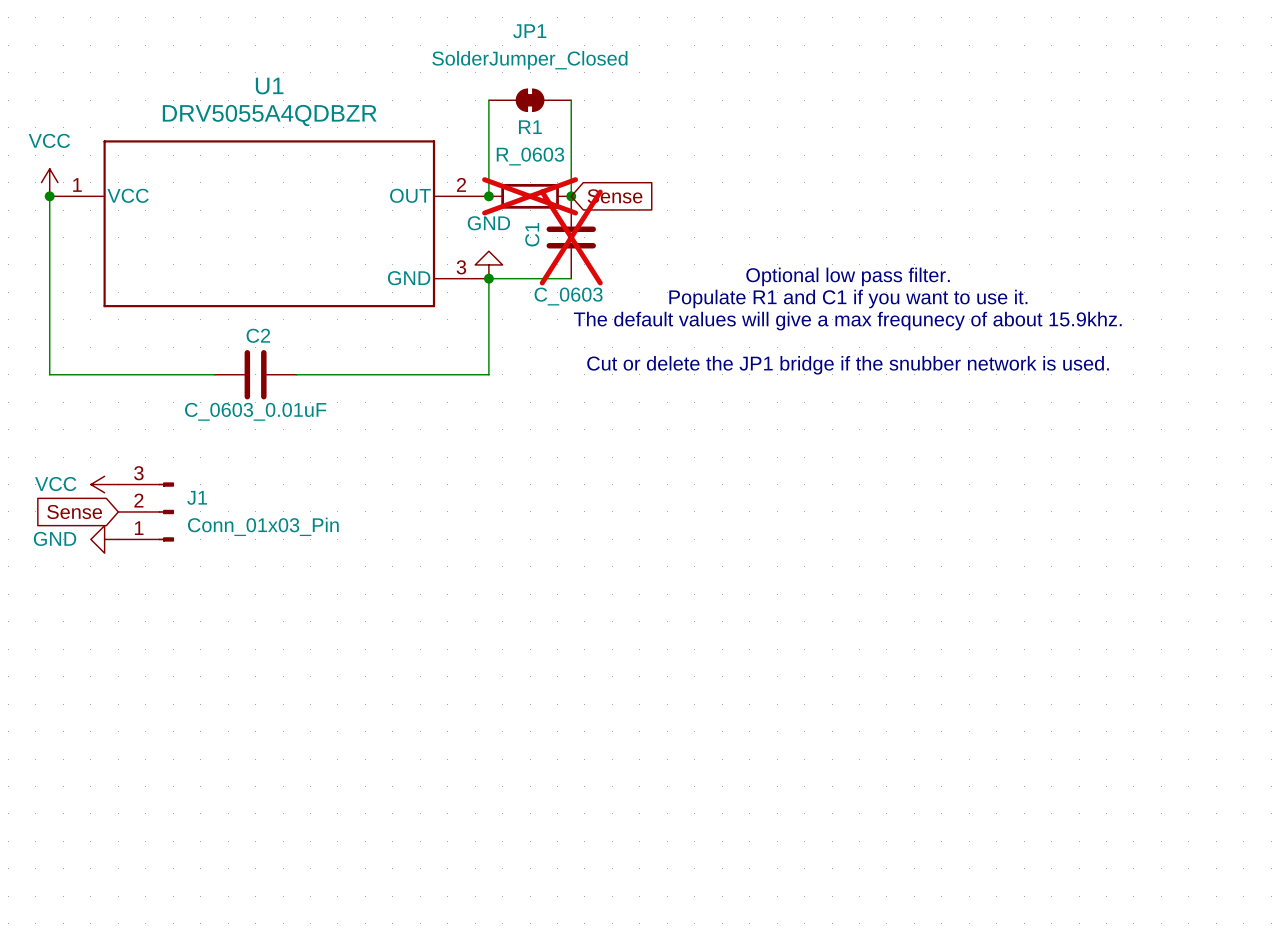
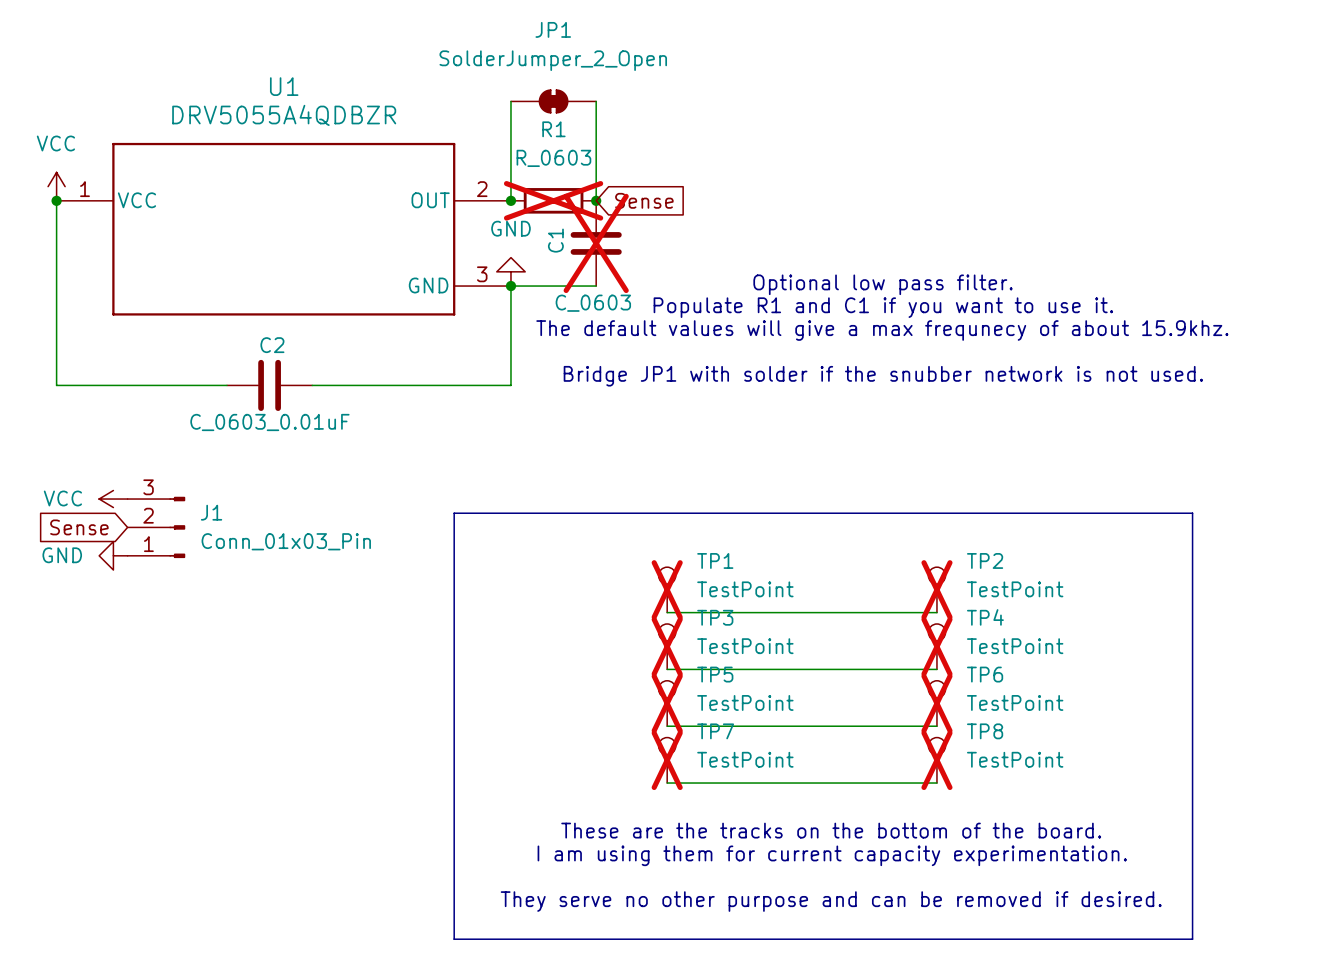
JP1 value: SolderJumper_Closed (529, 60) -> SolderJumper_2_Open (553, 60)
text: Cut or delete the JP1 bridge if the snubber network is used. (848, 365) -> Bridge JP1 with solder if the snubber network is not used. (883, 376)
line: none -> (454, 513) (1192, 513) (1192, 939) (454, 939) (454, 513)
TP1: none -> TestPoint (667, 589)
TP2: none -> TestPoint (936, 589)
wire: none -> (667, 612) (936, 612)
TP3: none -> TestPoint (667, 646)
TP4: none -> TestPoint (936, 646)
wire: none -> (667, 669) (936, 669)
TP5: none -> TestPoint (667, 703)
TP6: none -> TestPoint (936, 703)
wire: none -> (667, 726) (936, 726)
TP7: none -> TestPoint (667, 760)
TP8: none -> TestPoint (936, 760)
wire: none -> (667, 783) (936, 783)
text: none -> These are the tracks on the bottom of the board. (831, 830)
text: none -> I am using them for current capacity experimentation. (832, 855)
text: none -> They serve no other purpose and can be removed if desired. (831, 901)

